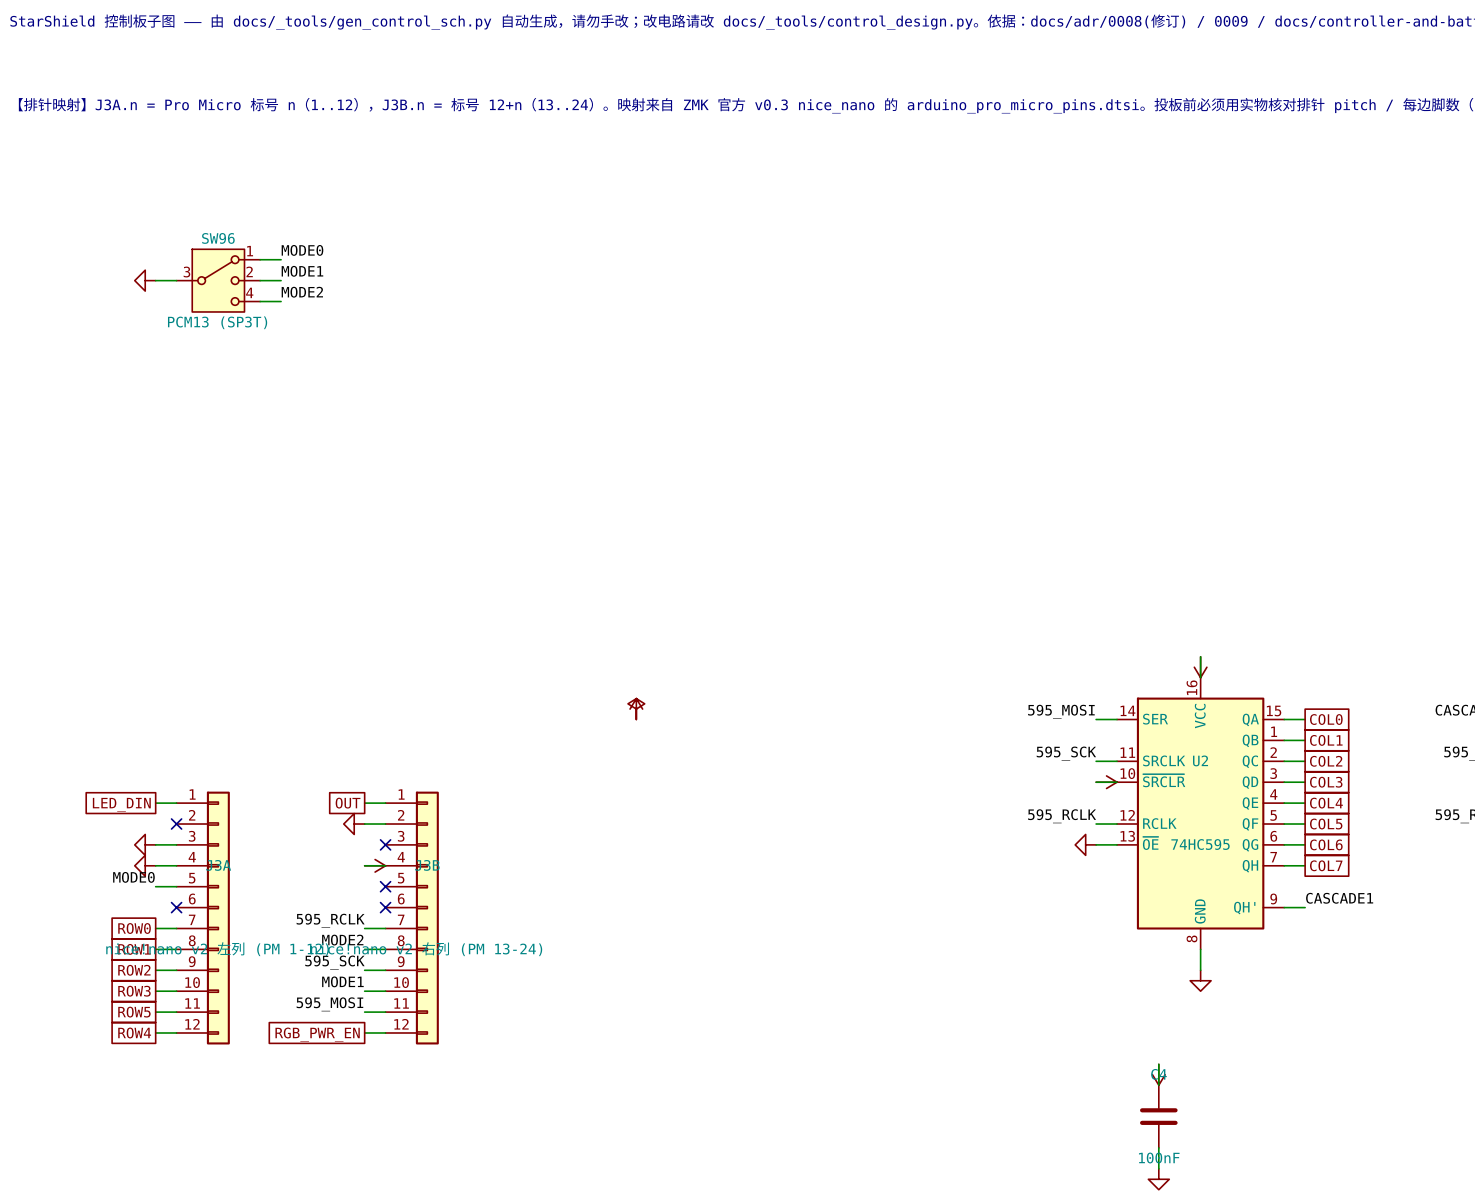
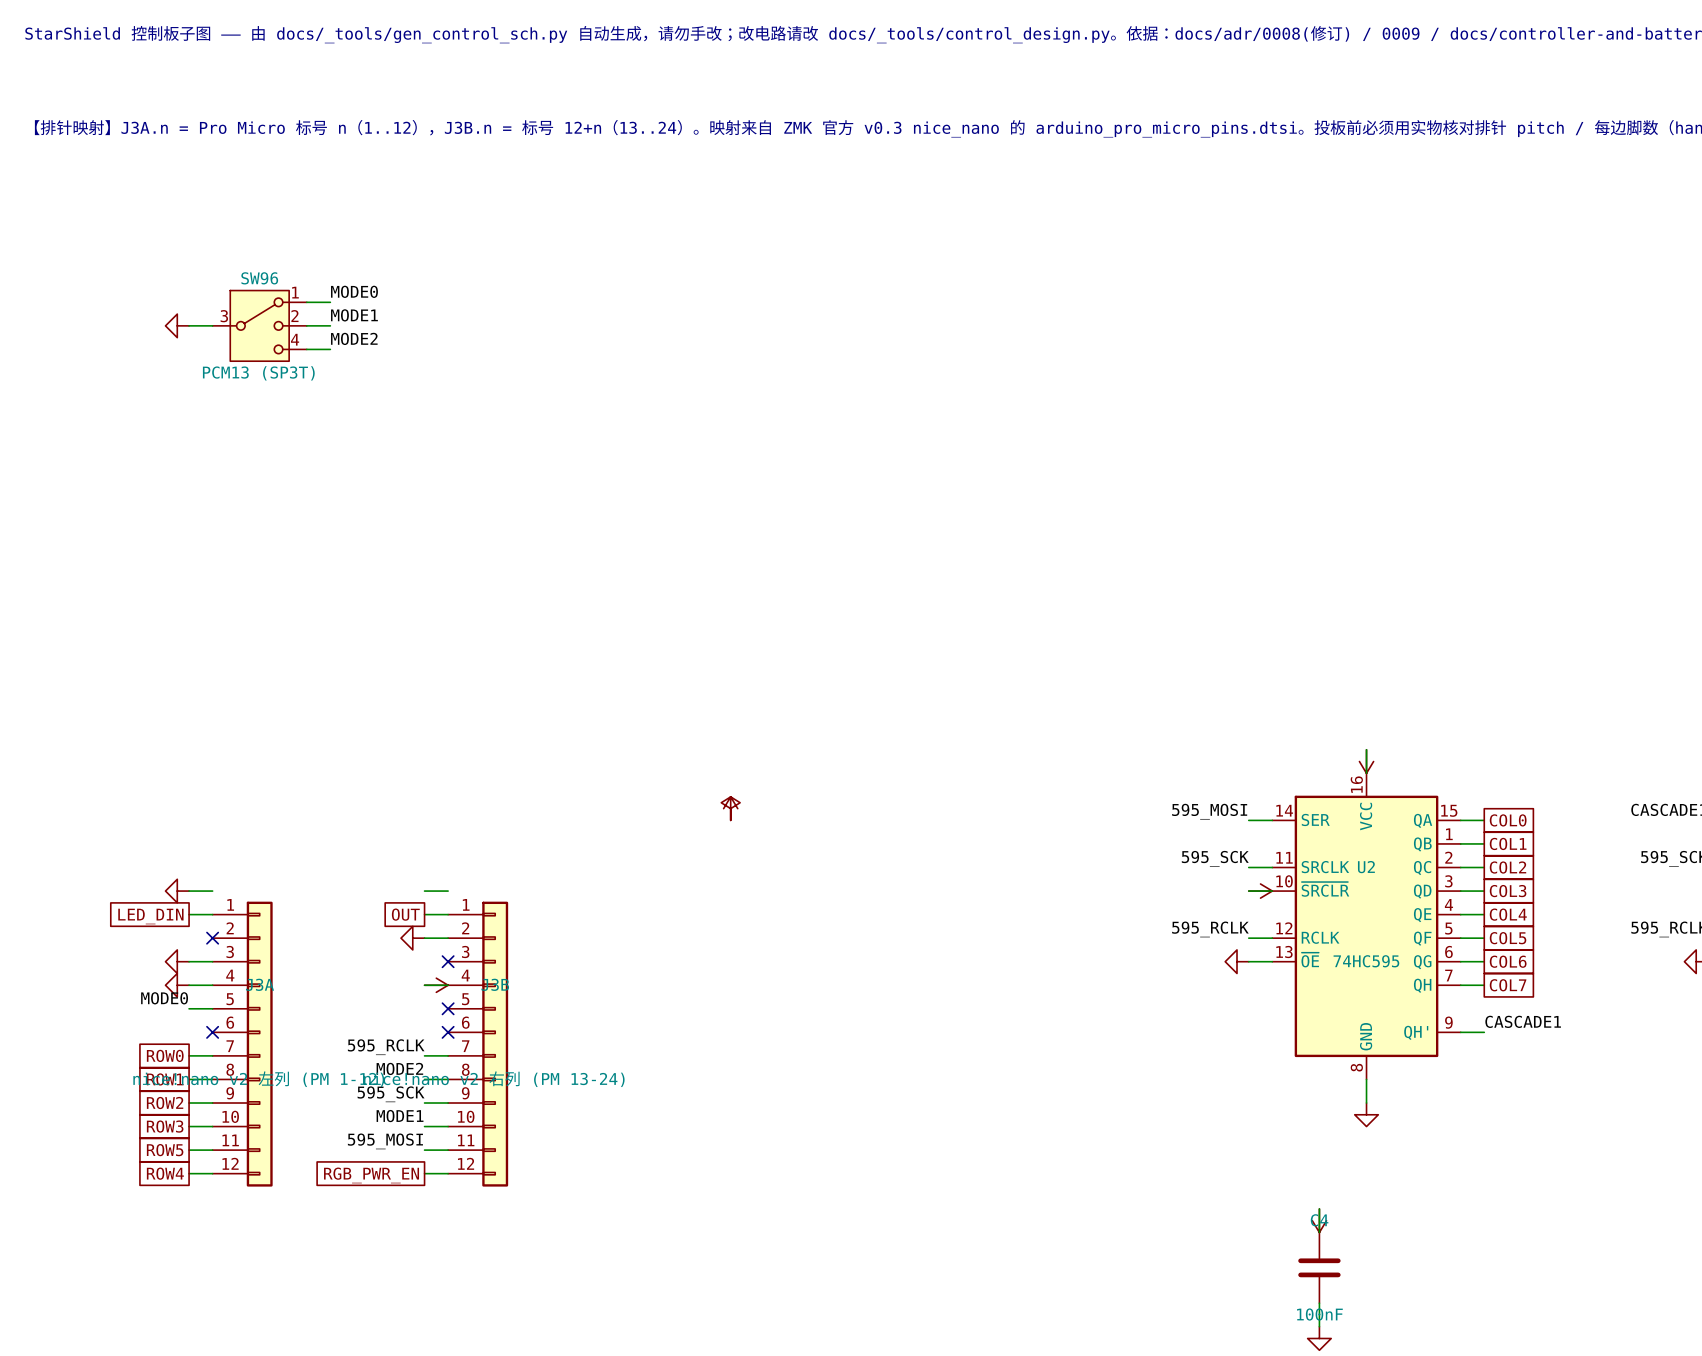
power symbol: none -> (177, 891)
wire: none -> (189, 891) (212, 891)
wire: none -> (424, 891) (448, 891)

